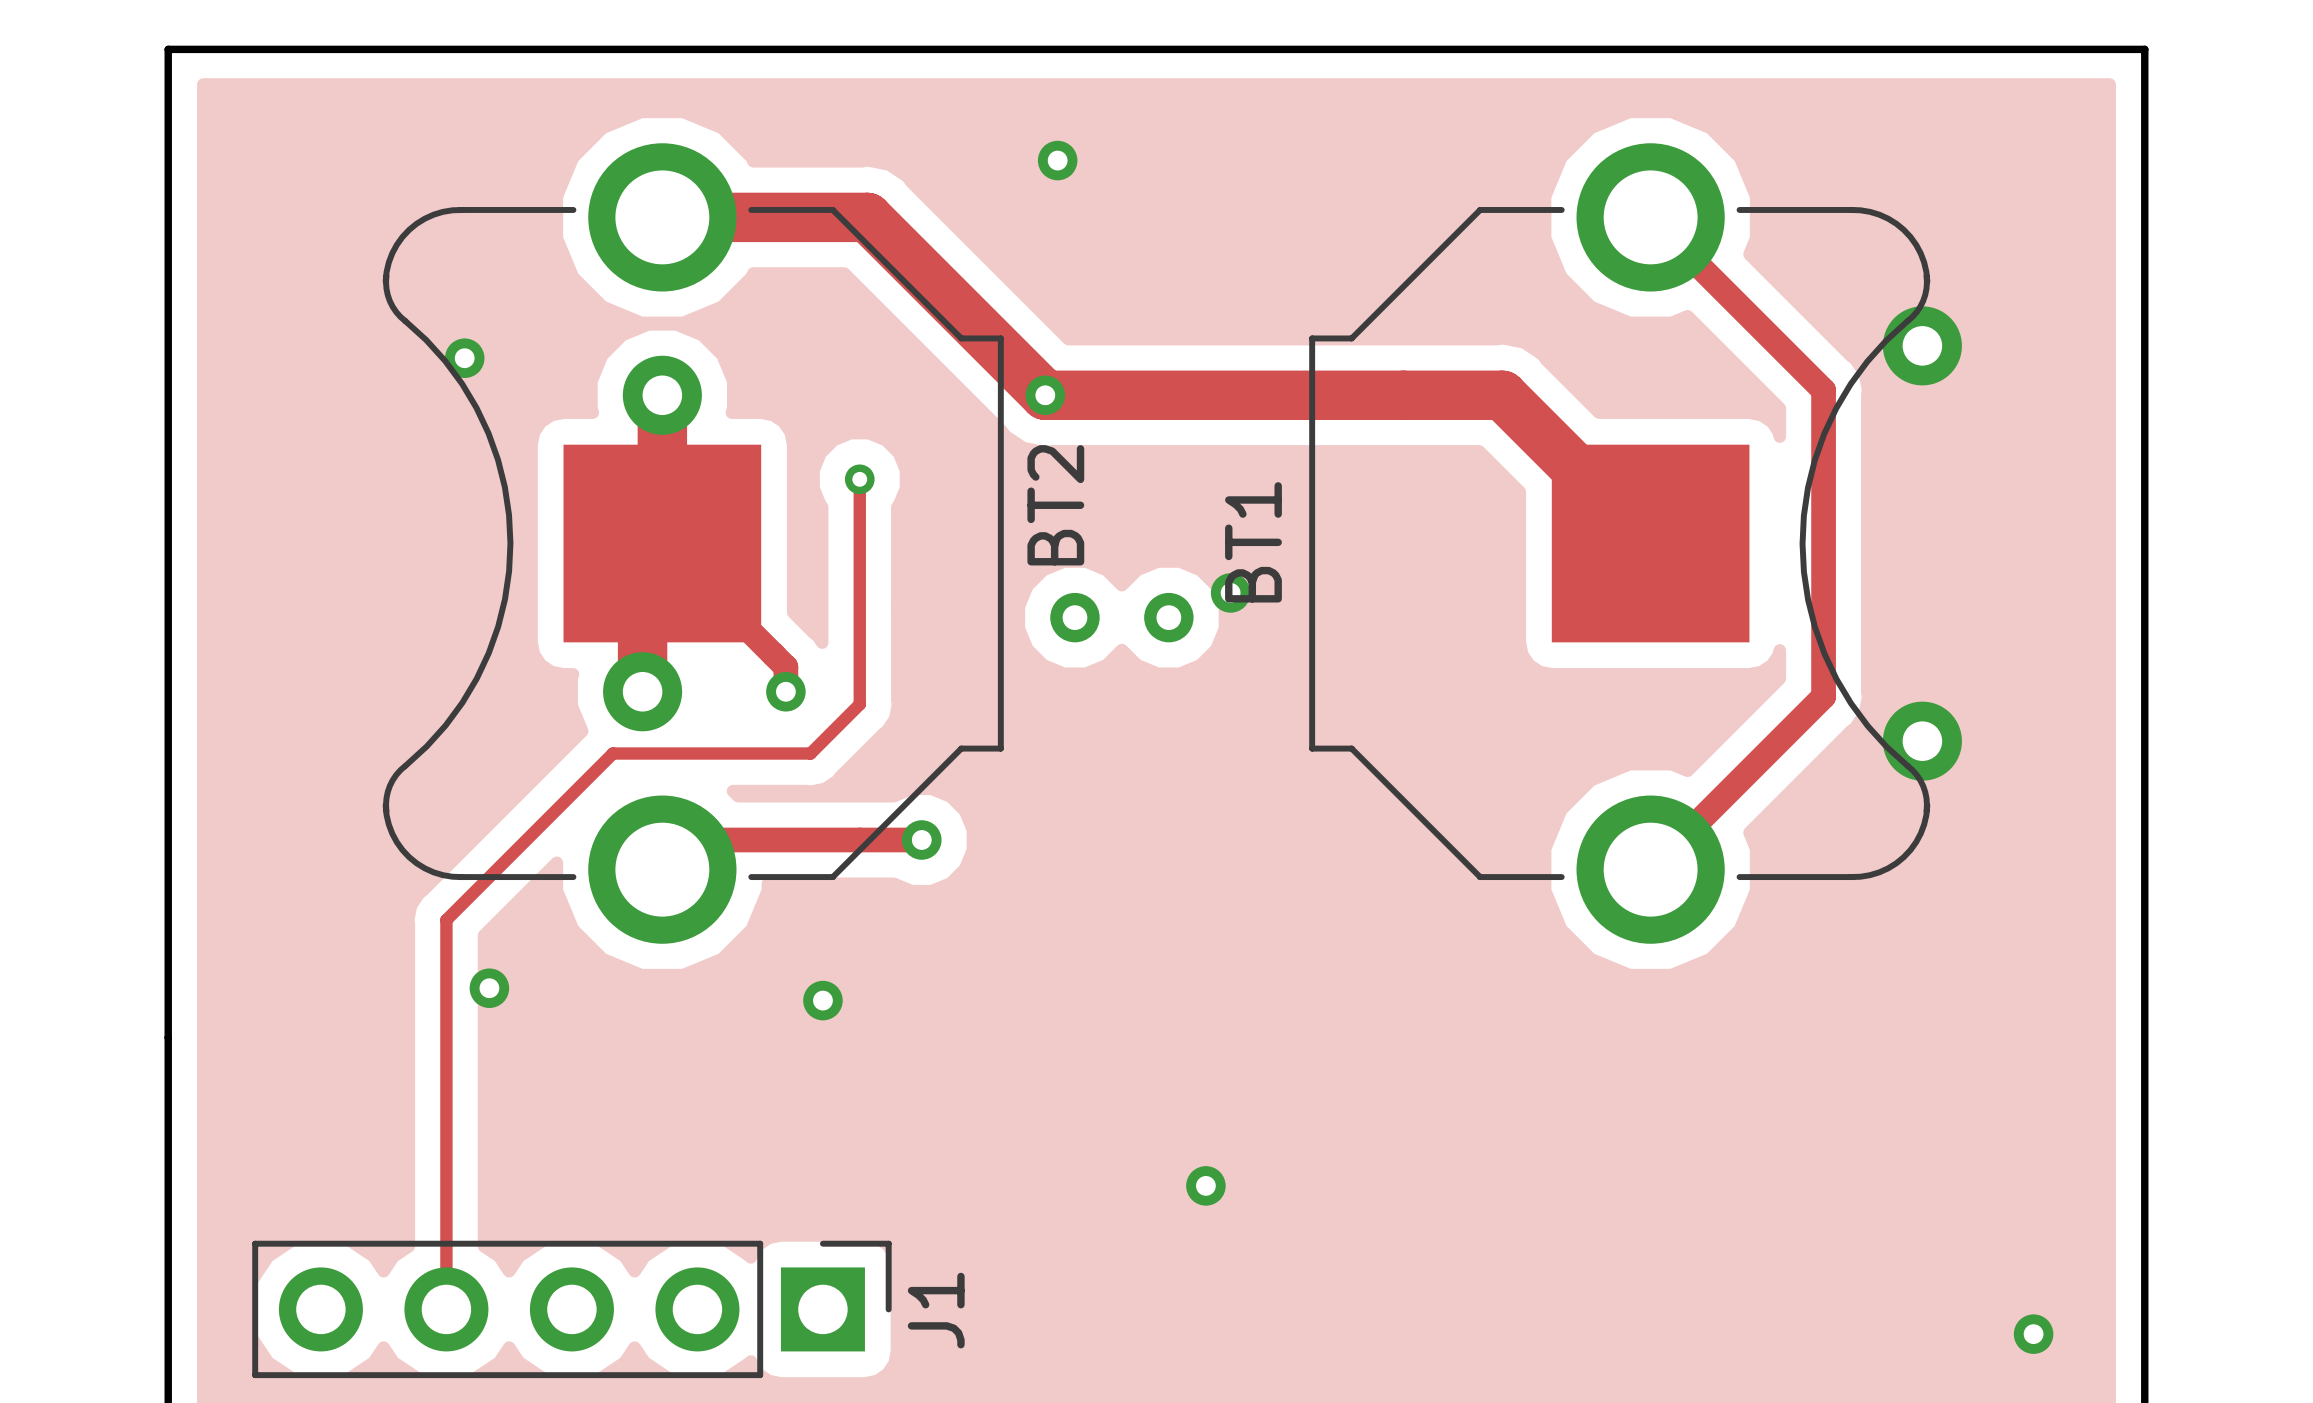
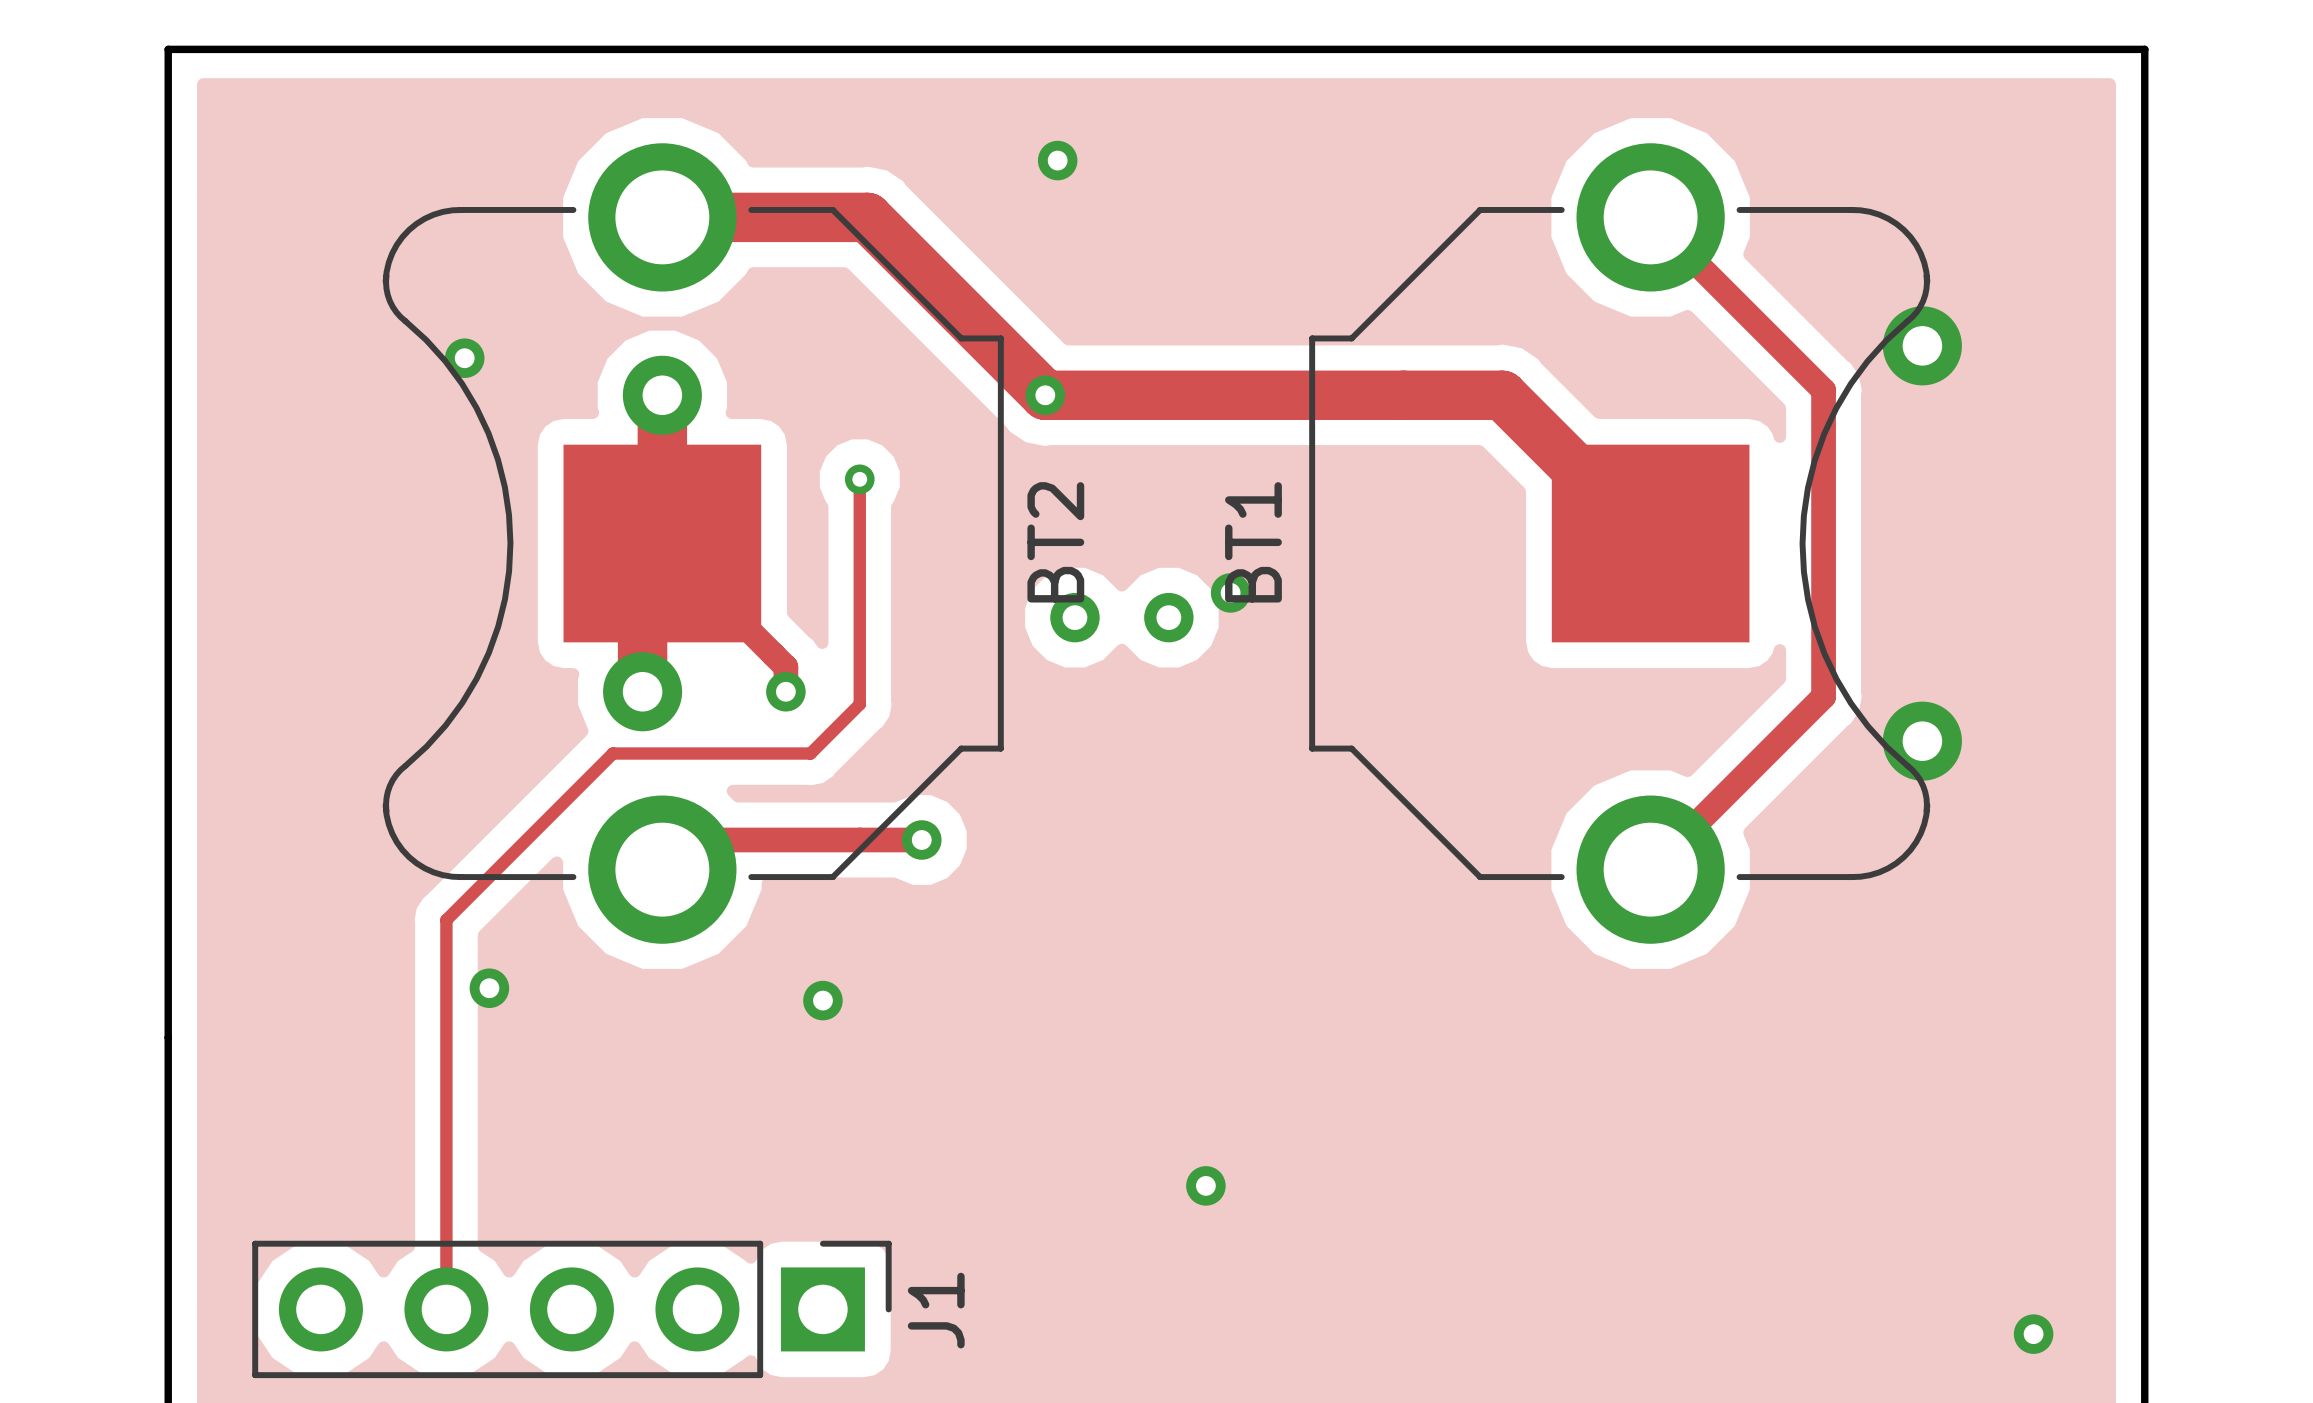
BT2 name position: BT2 (1055, 505) -> BT2 (1055, 542)

